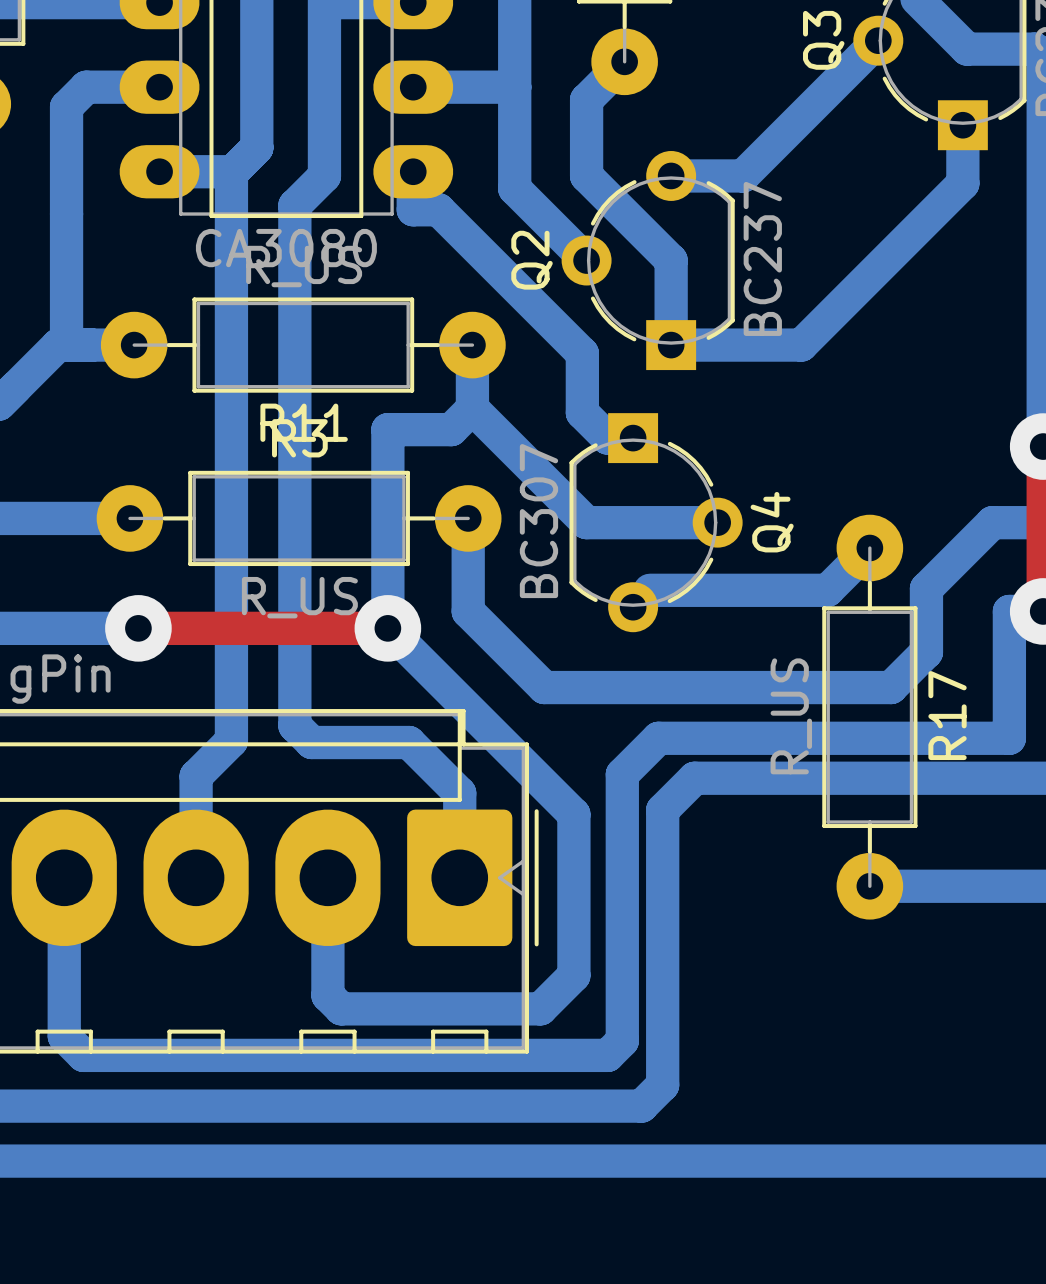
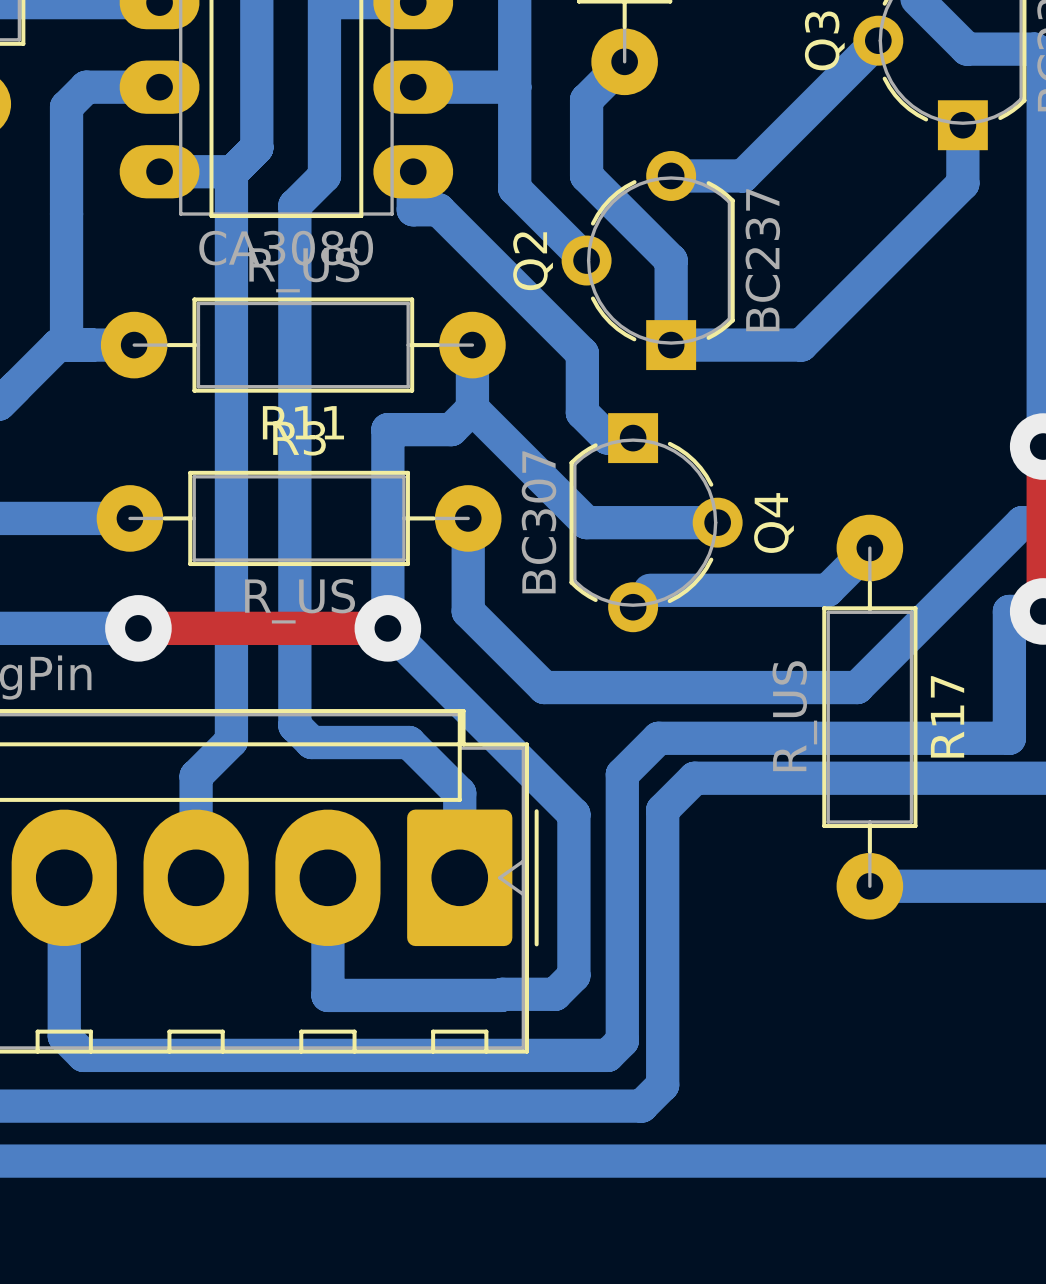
bottom track: (1022, 522) (992, 522) (926, 588) (926, 652) (891, 687) (857, 687) -> (1022, 522) (857, 687)
bottom track: (555, 994) (540, 1008) (341, 1008) (327, 995) -> (555, 994) (327, 995)

